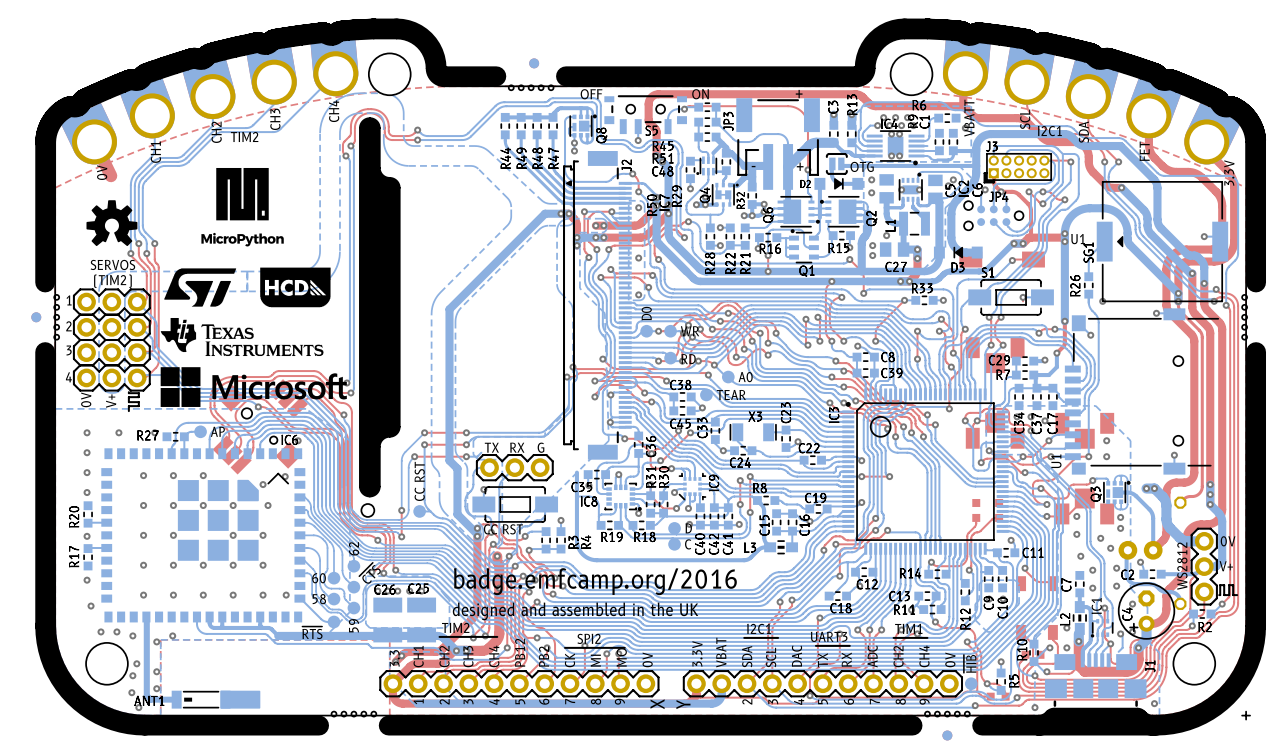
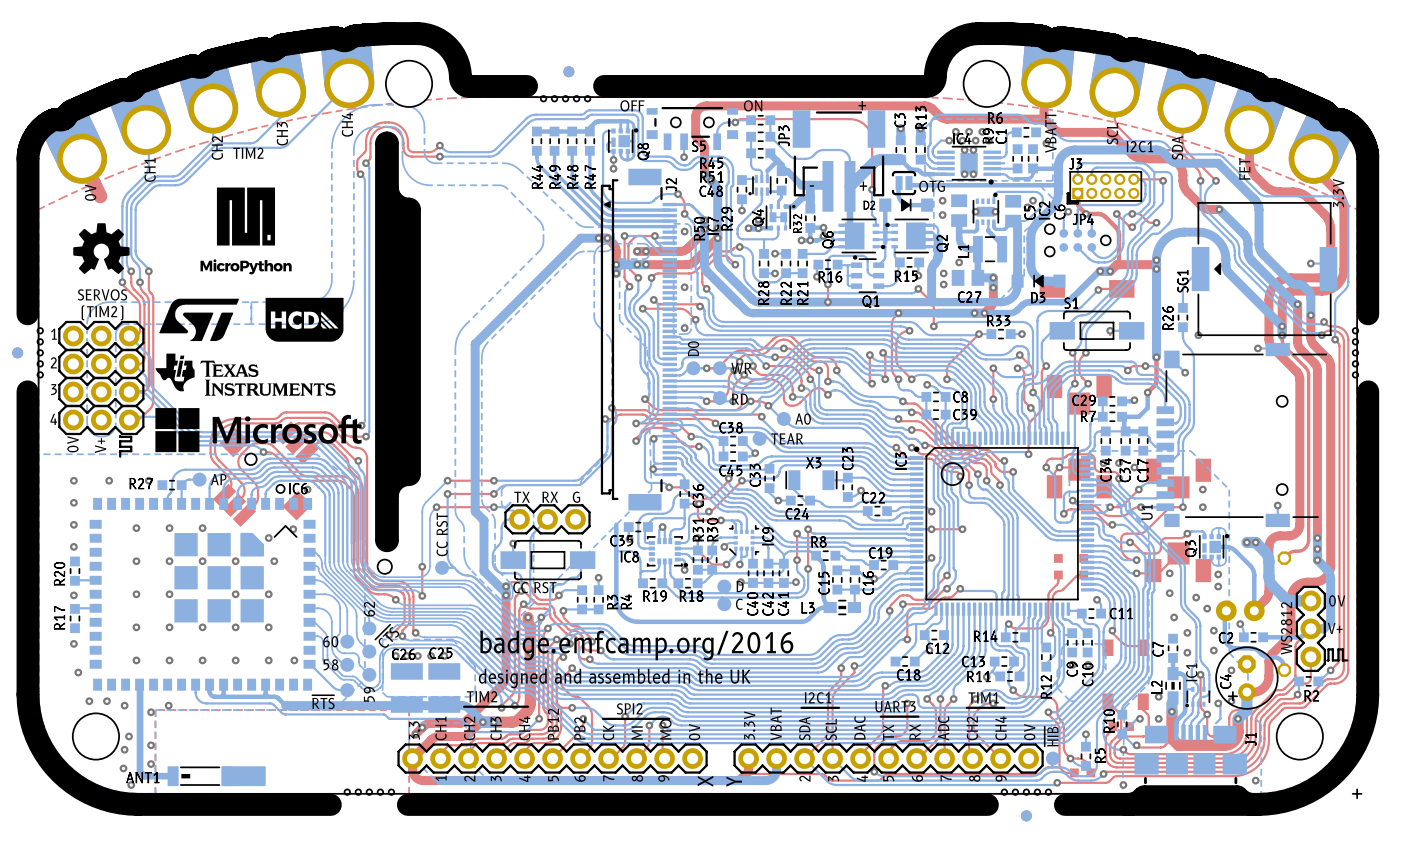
U1 name rotation: 0° (1078, 239) -> 90° counterclockwise (1147, 512)
U1 name position: U1 (1078, 239) -> U1 (1147, 512)

